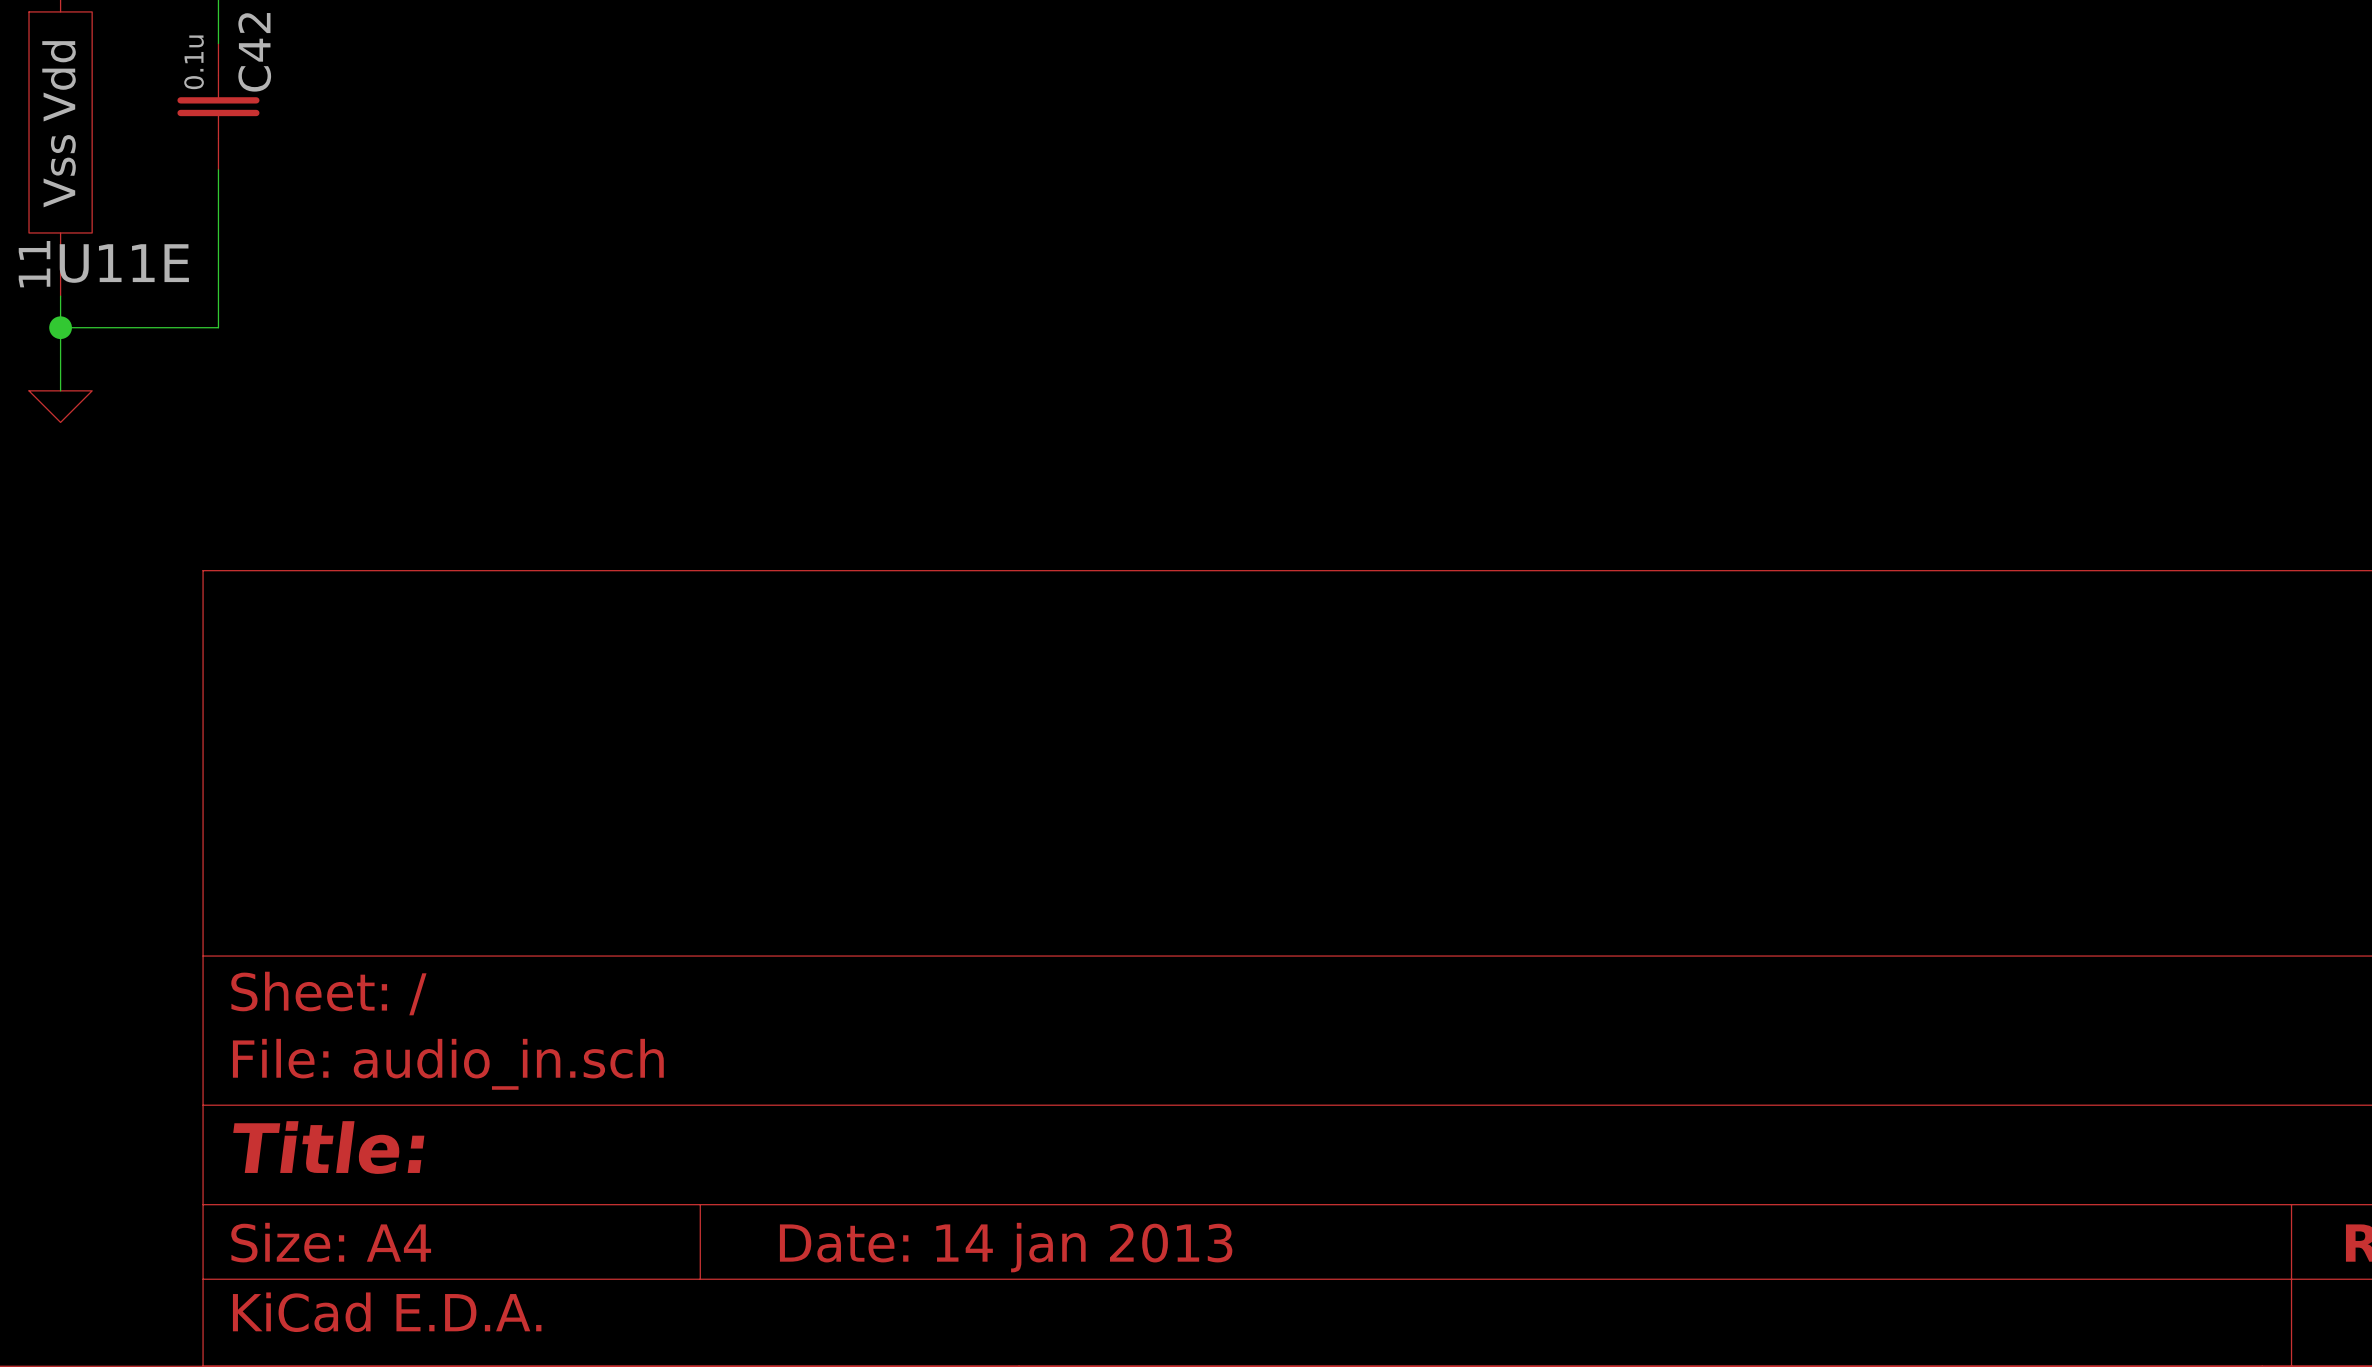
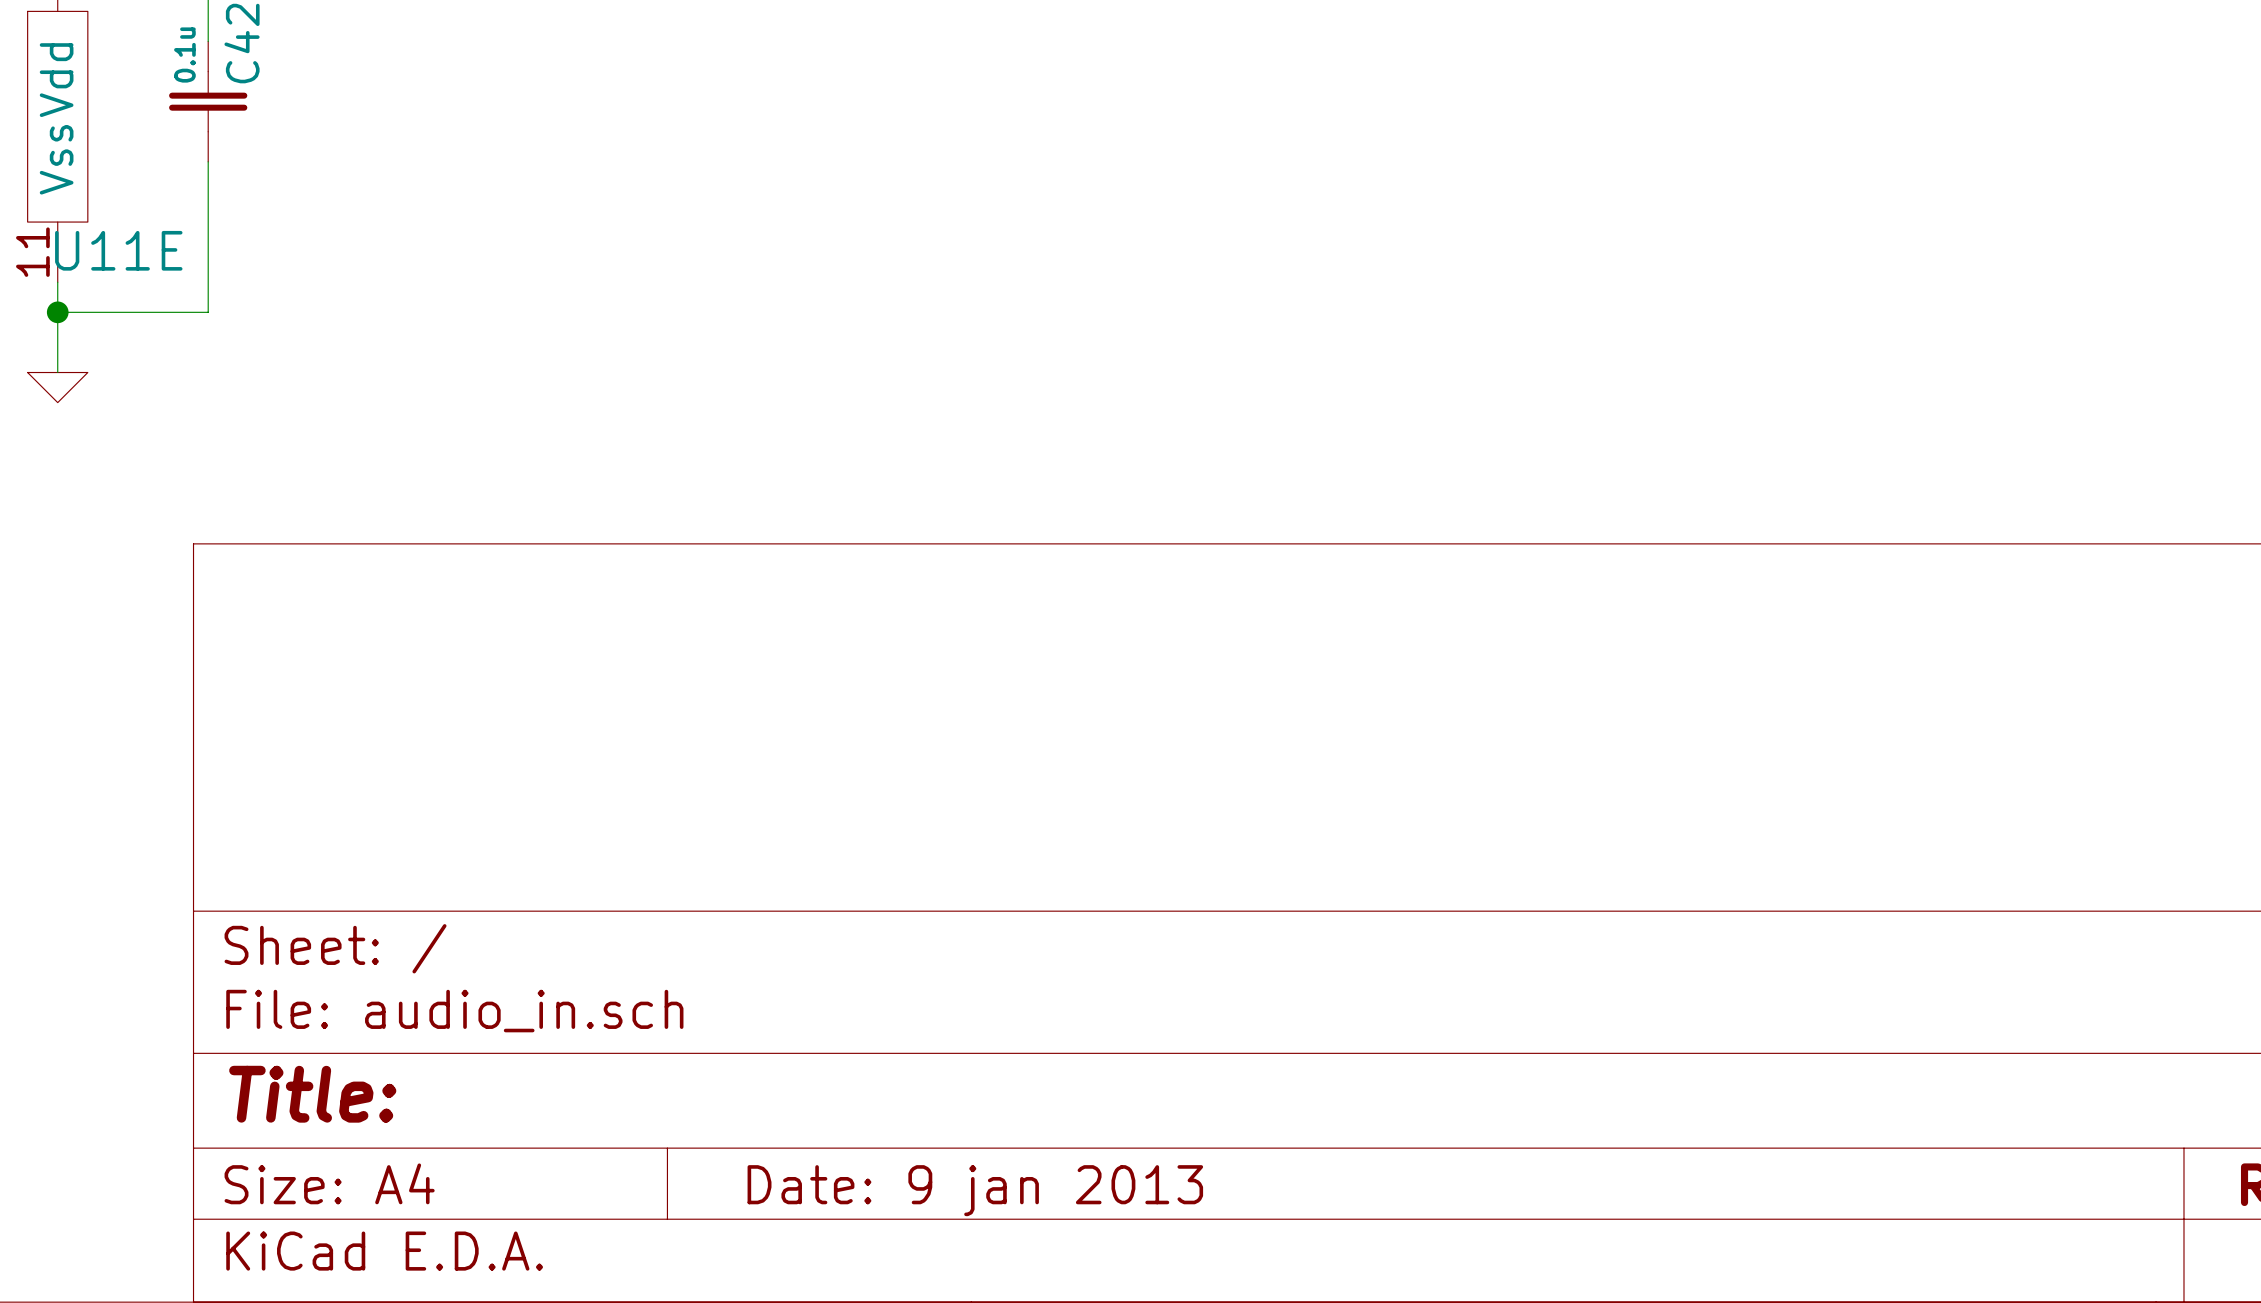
title block: Date: 14 jan 2013 (1006, 1247) -> Date: 9 jan 2013 (975, 1190)

